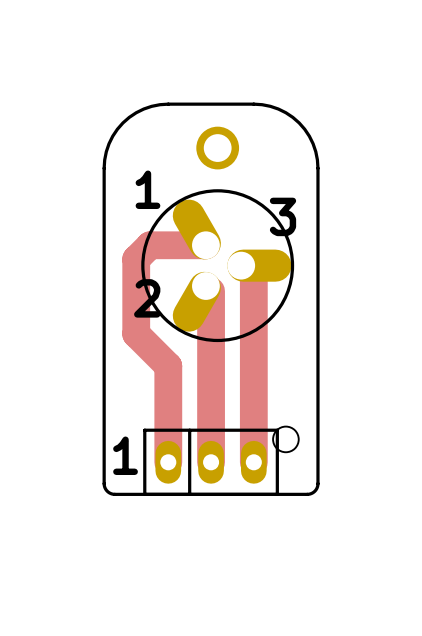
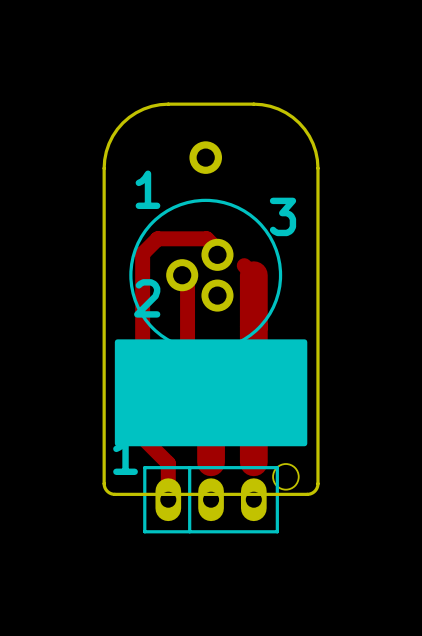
part footprint: [141, 126, 295, 343] -> [129, 141, 283, 352]
track: (202, 245) (205, 245) (150, 245) (136, 259) (136, 334) (168, 366) (168, 462) -> none
track: none -> (222, 254) (206, 238) (157, 238) (142, 253) (142, 437) (168, 463) (168, 499)
track: (205, 286) (211, 291) (211, 373) -> (187, 275) (187, 350) (211, 373)
drawing: none -> [114, 339, 308, 447]
part position: (220, 461) -> (220, 498)

